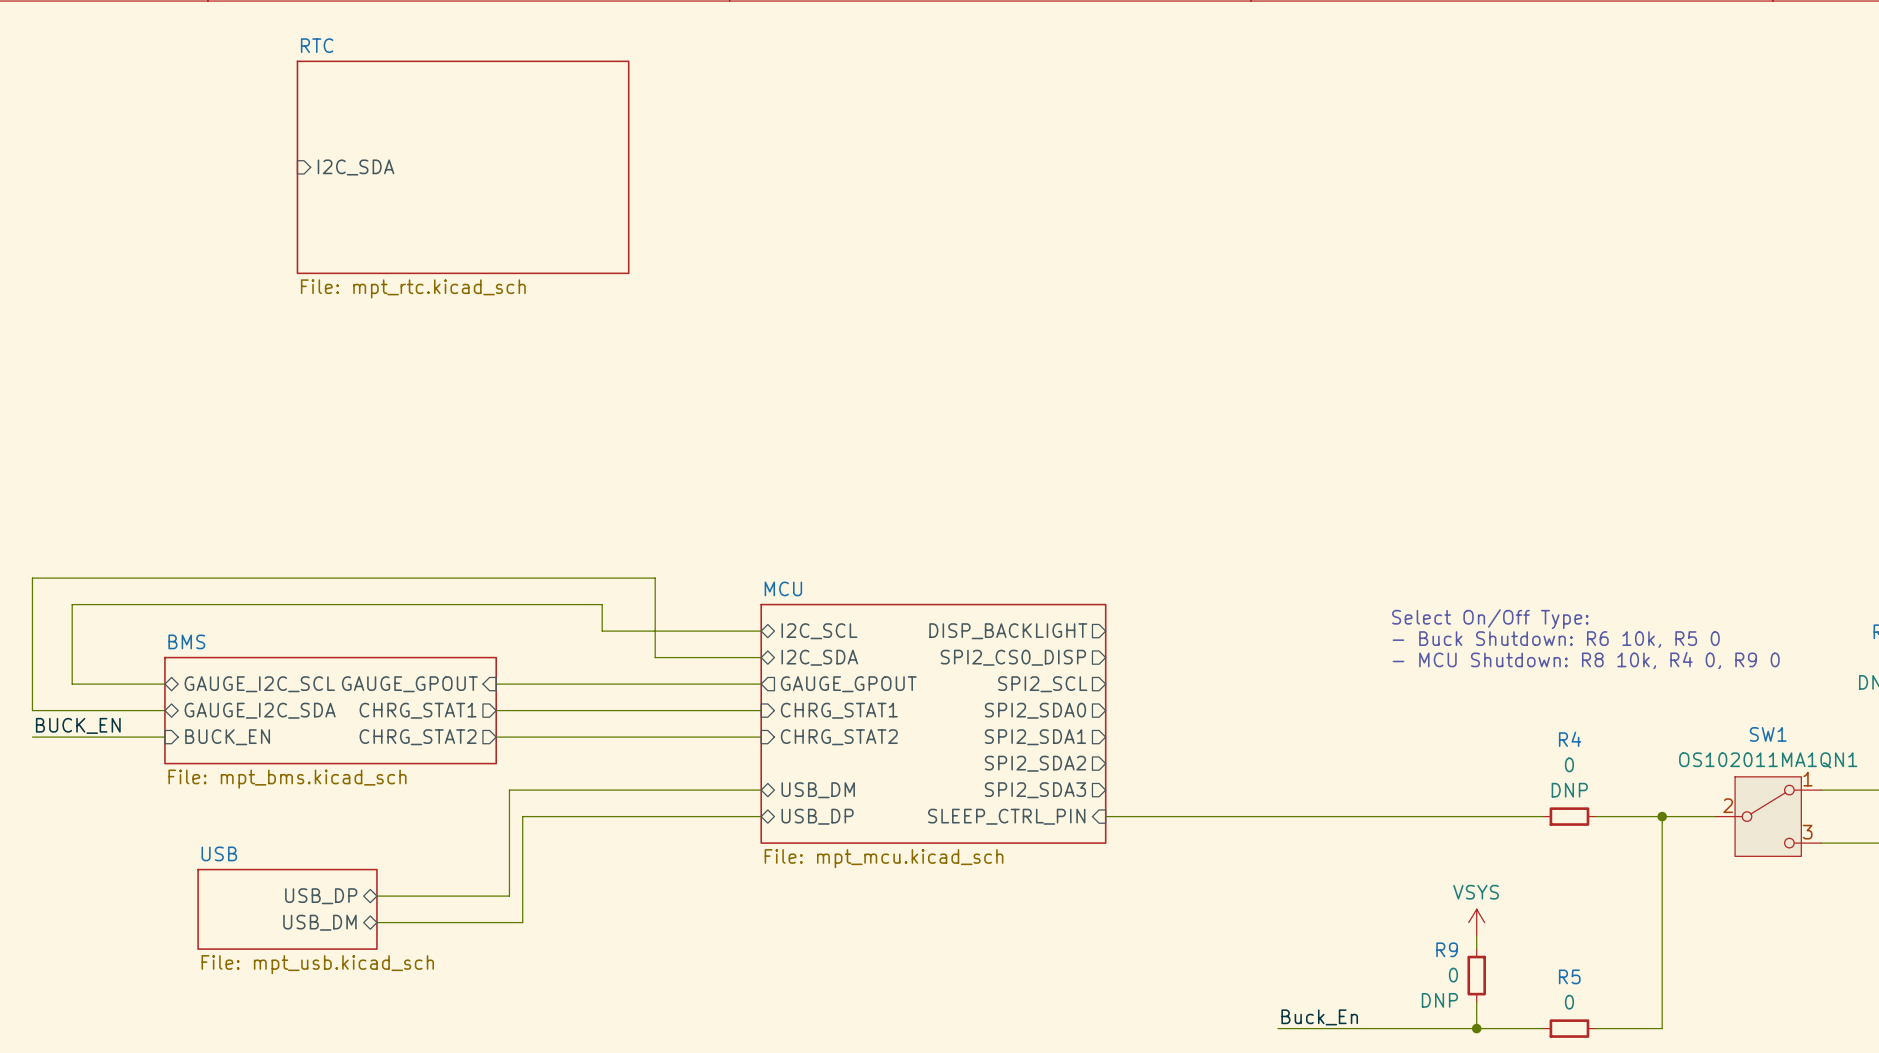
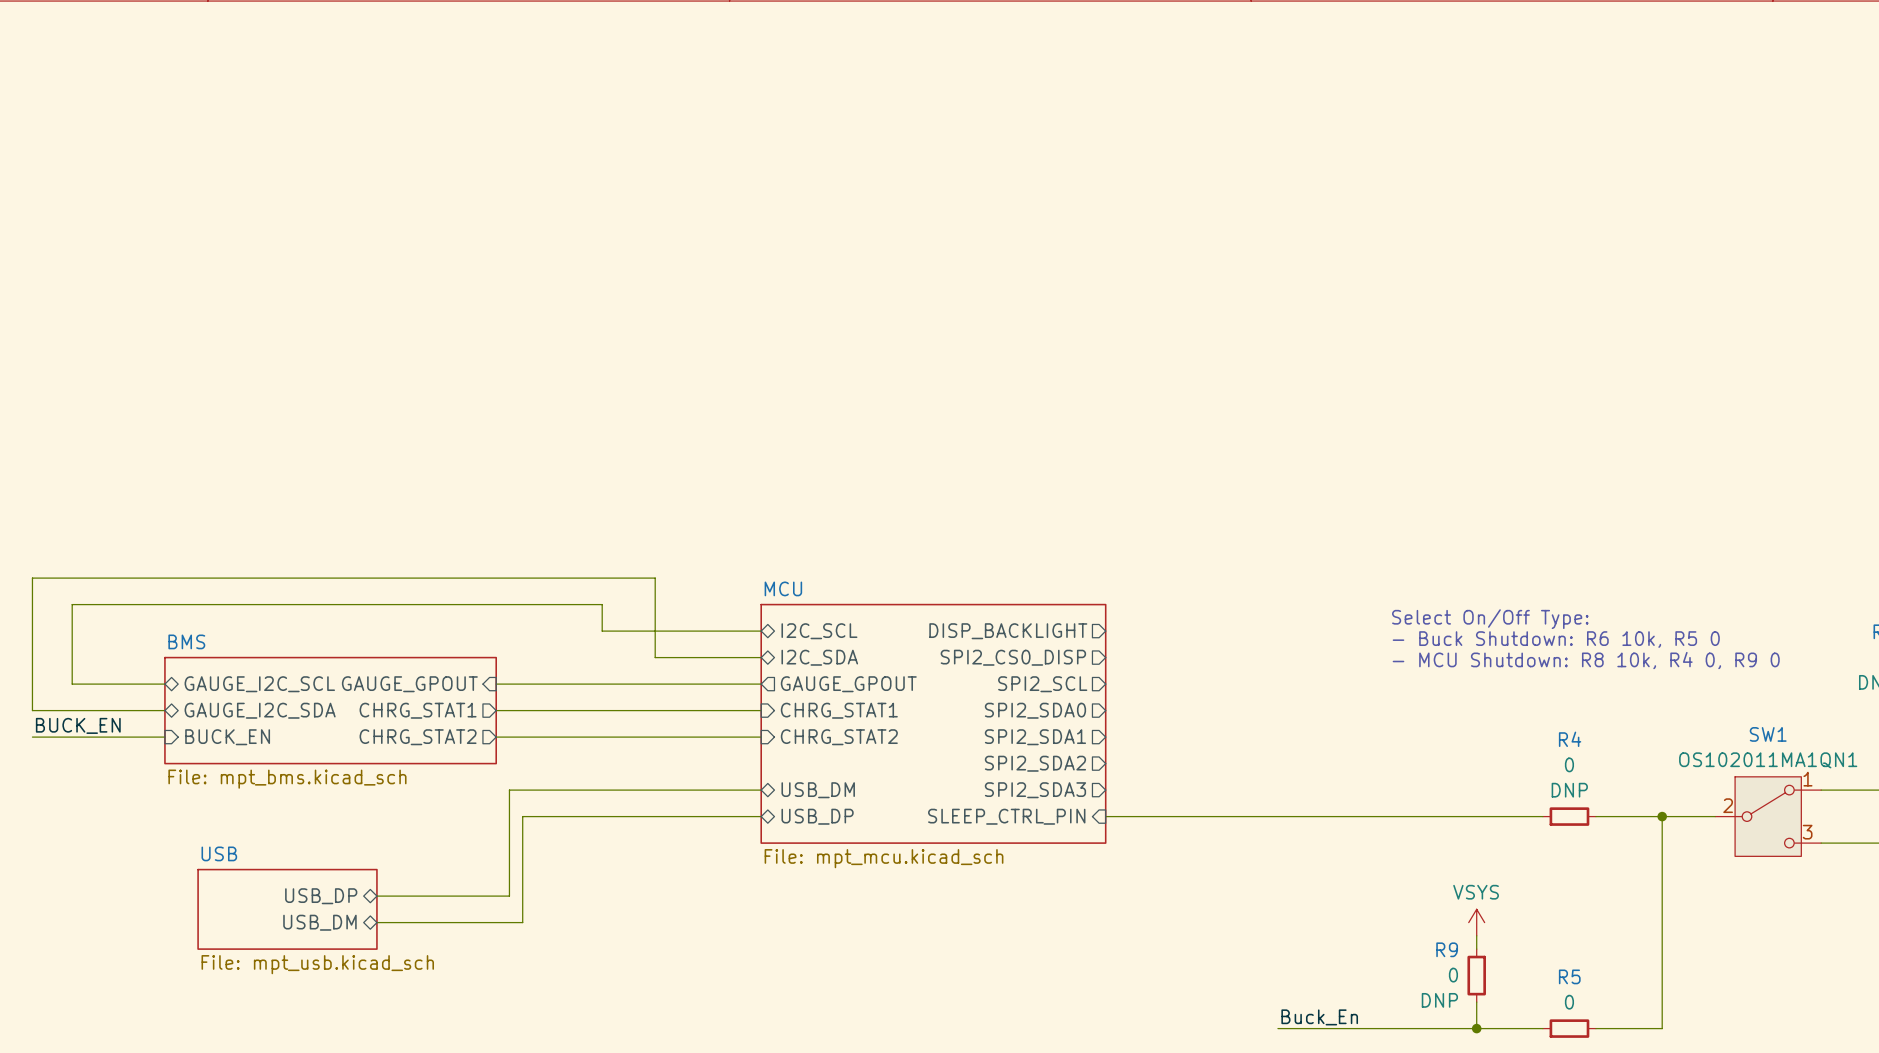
sheet pin: I2C_SDA (356, 167) -> none
sheet RTC: File: mpt_rtc.kicad_sch (463, 167) -> none

